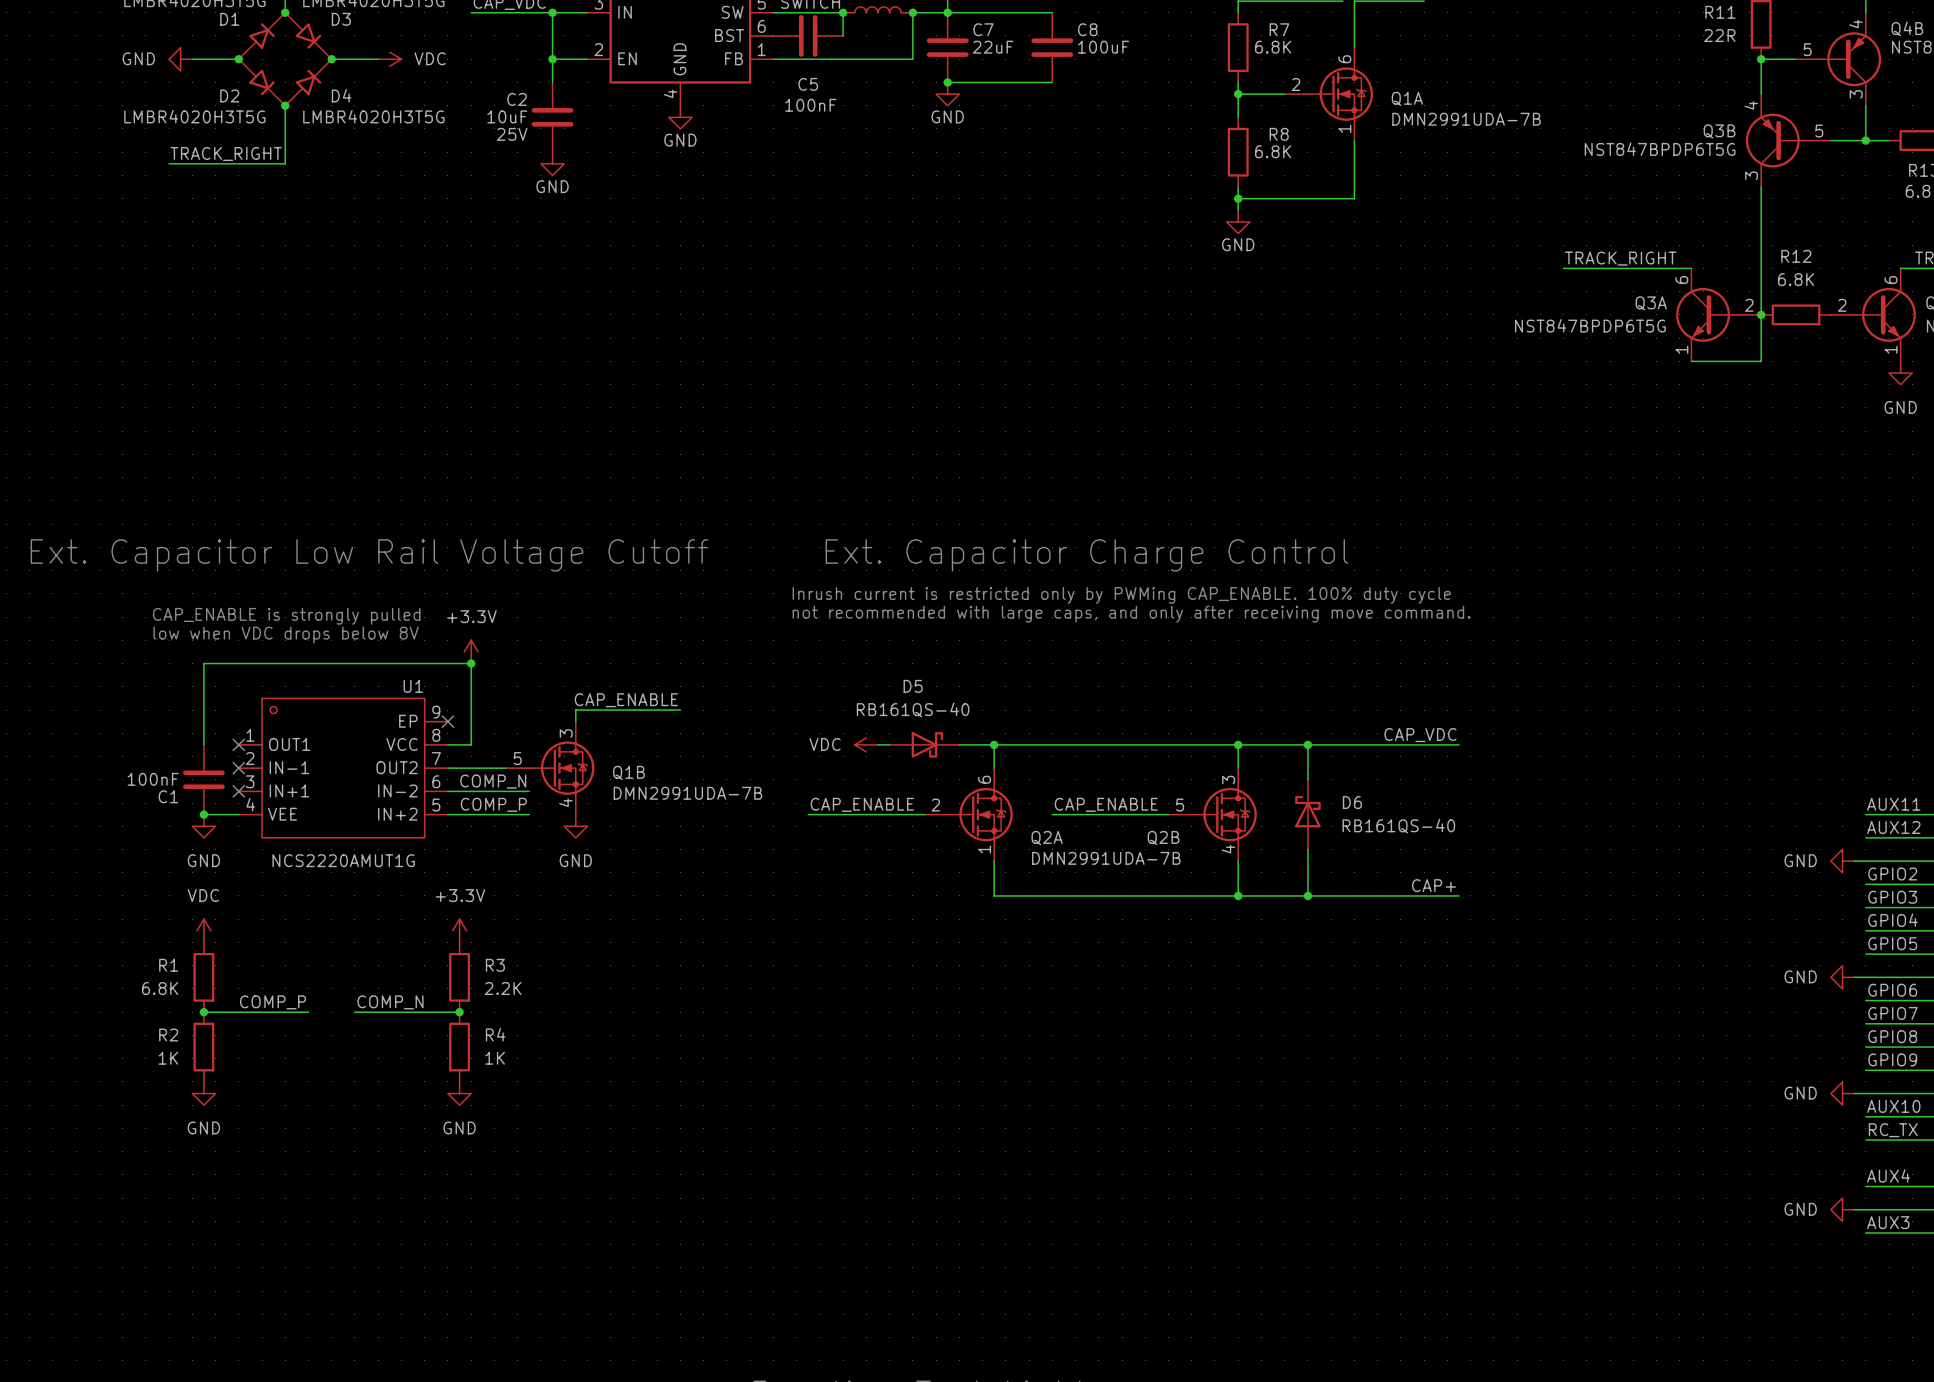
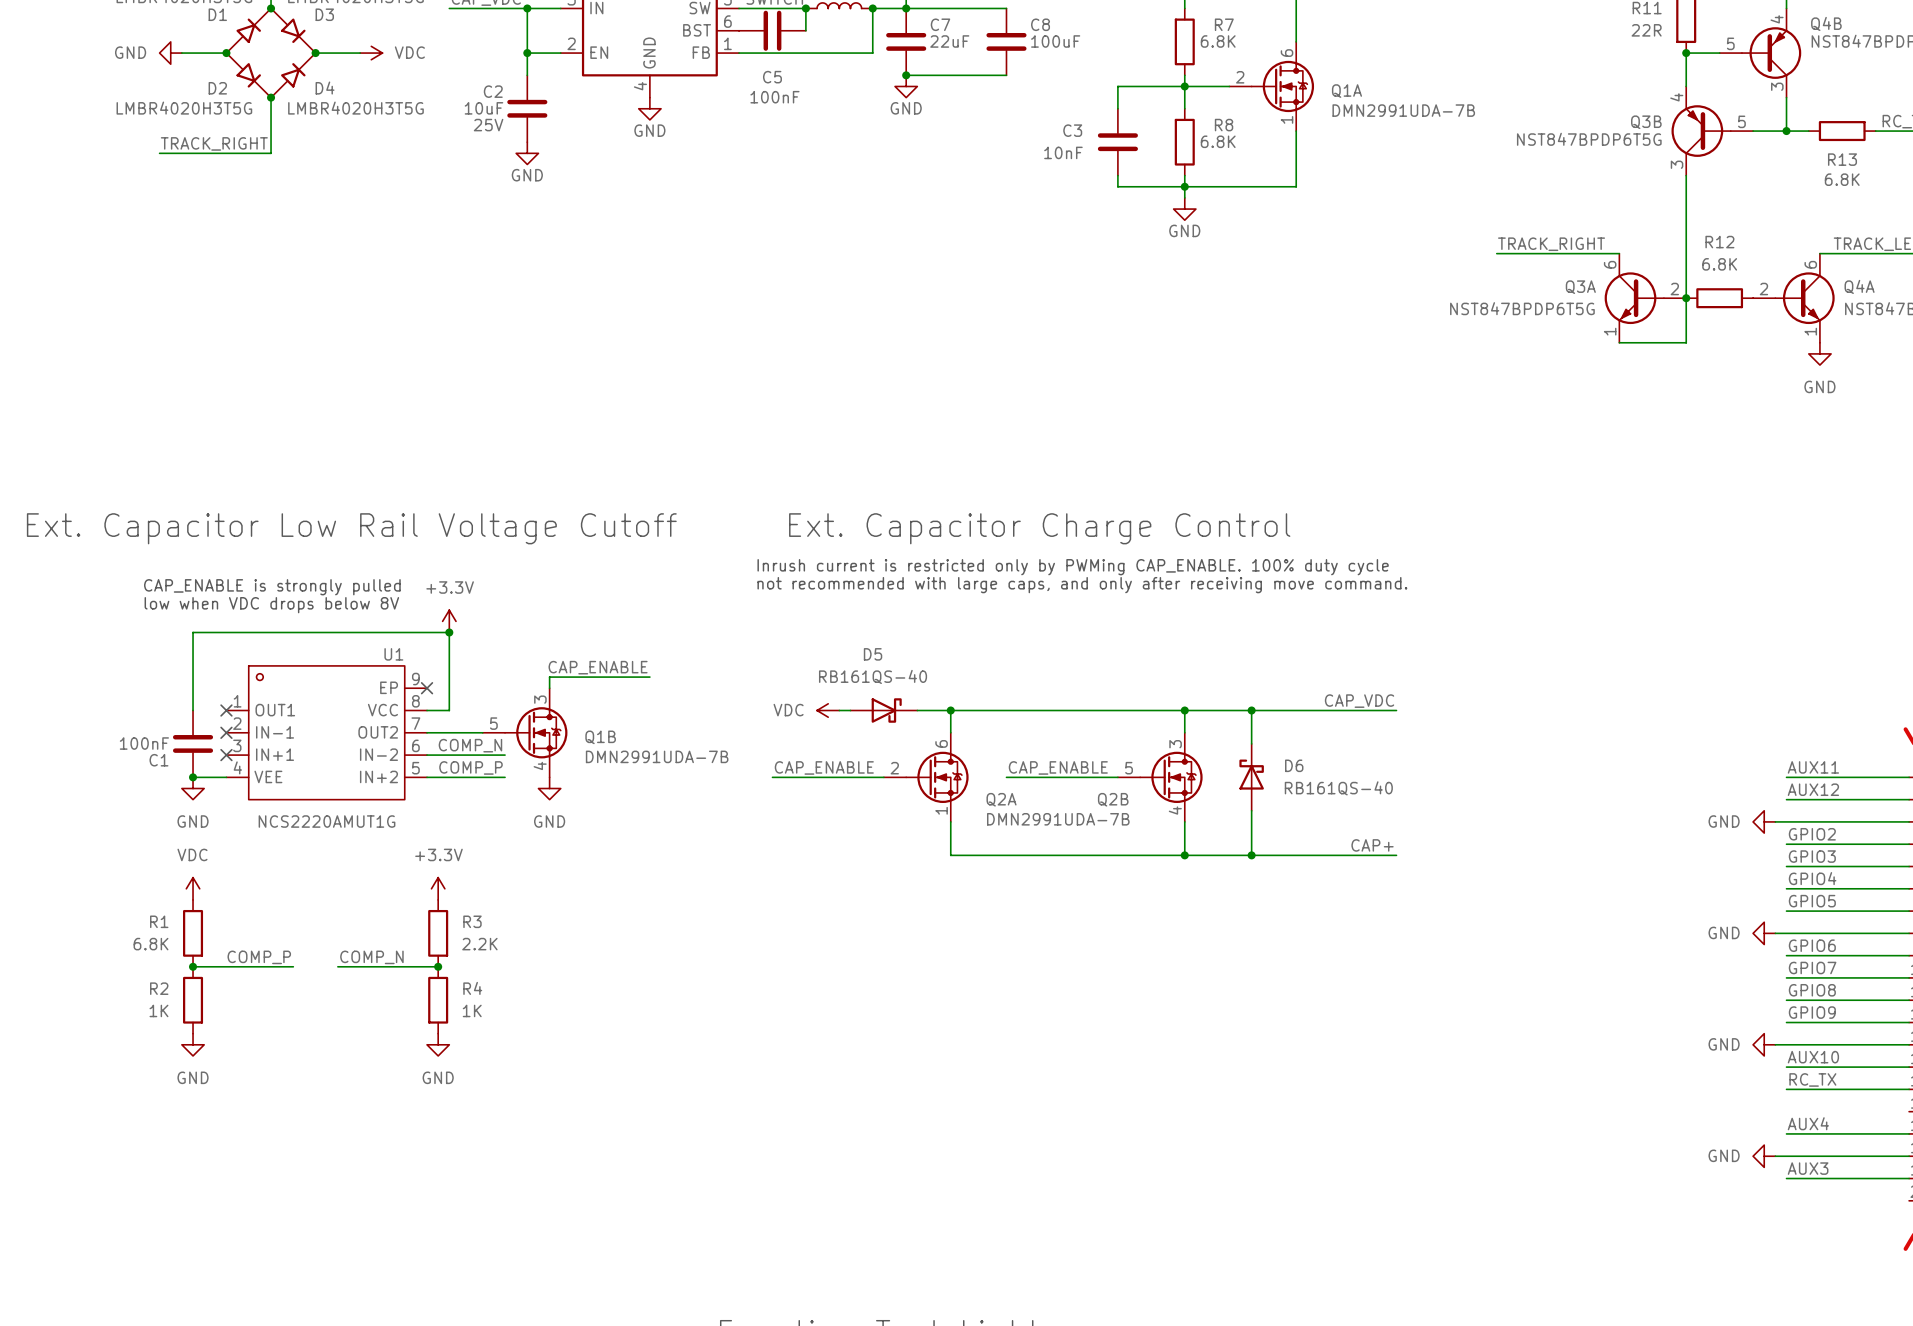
wire: none -> (1184, 86) (1117, 86) (1117, 108)
C3: none -> 10nF (1117, 142)
wire: none -> (1117, 175) (1117, 186) (1184, 186)

